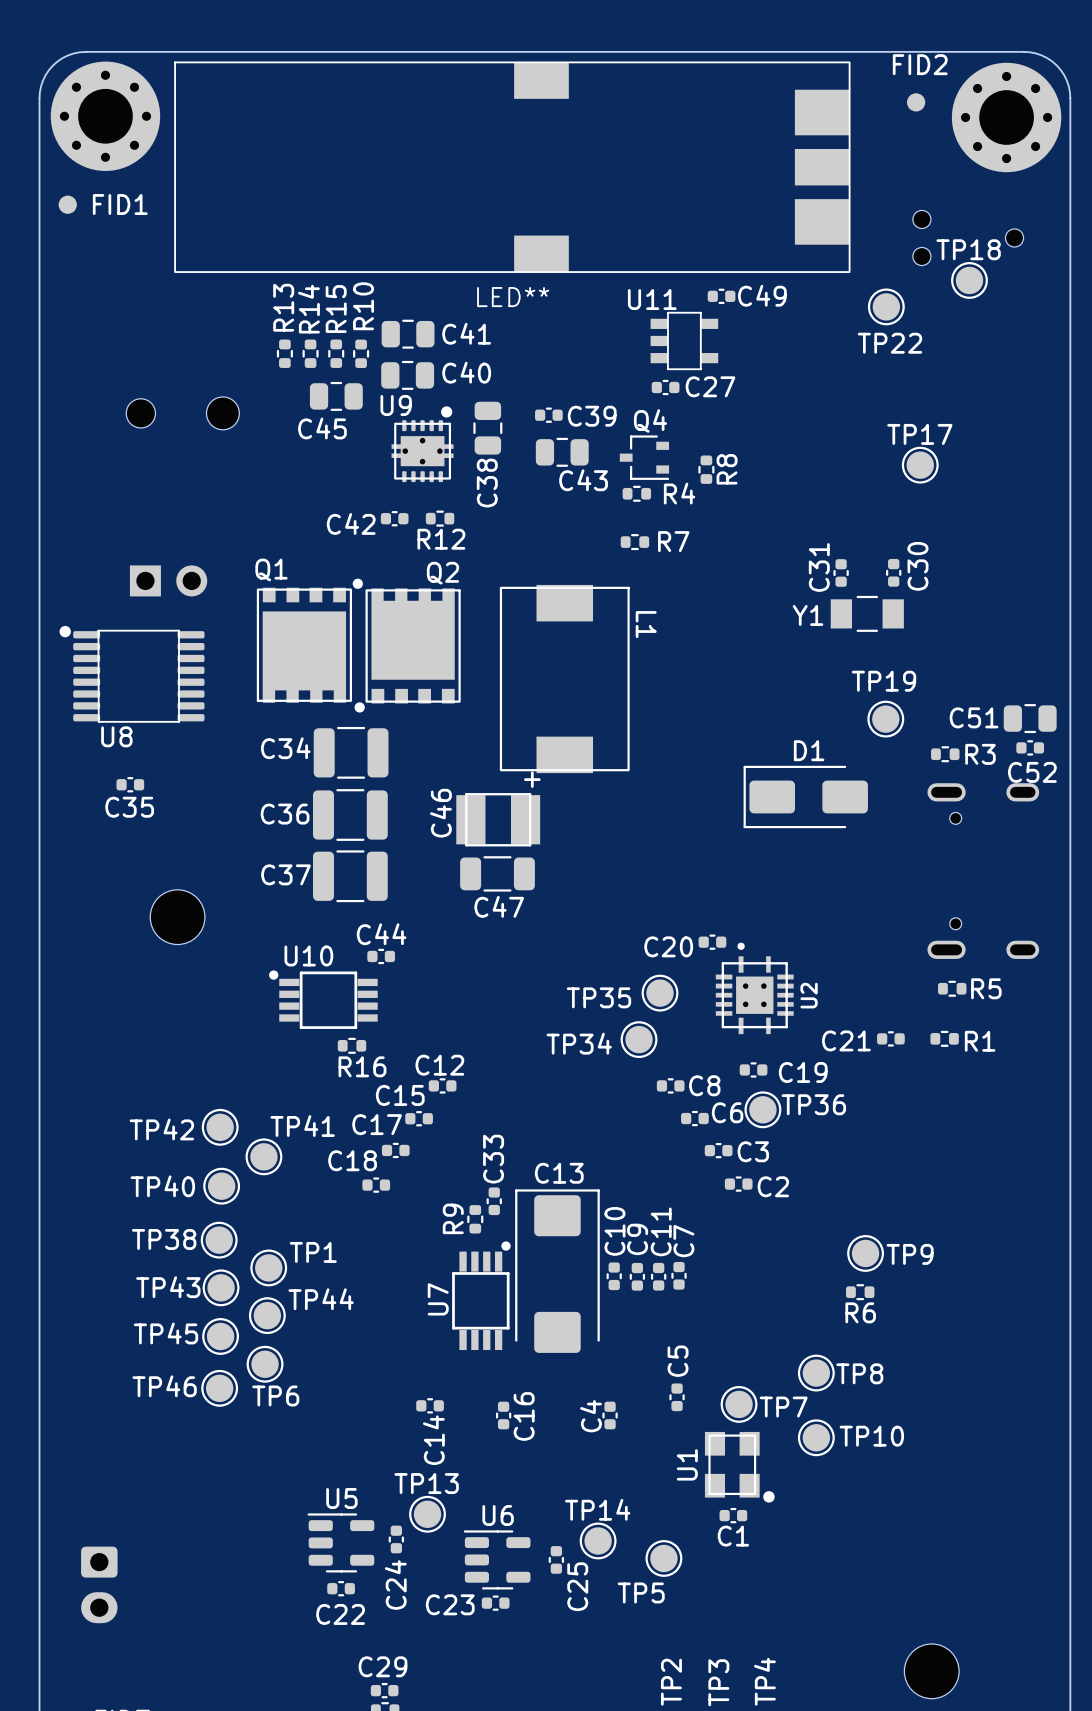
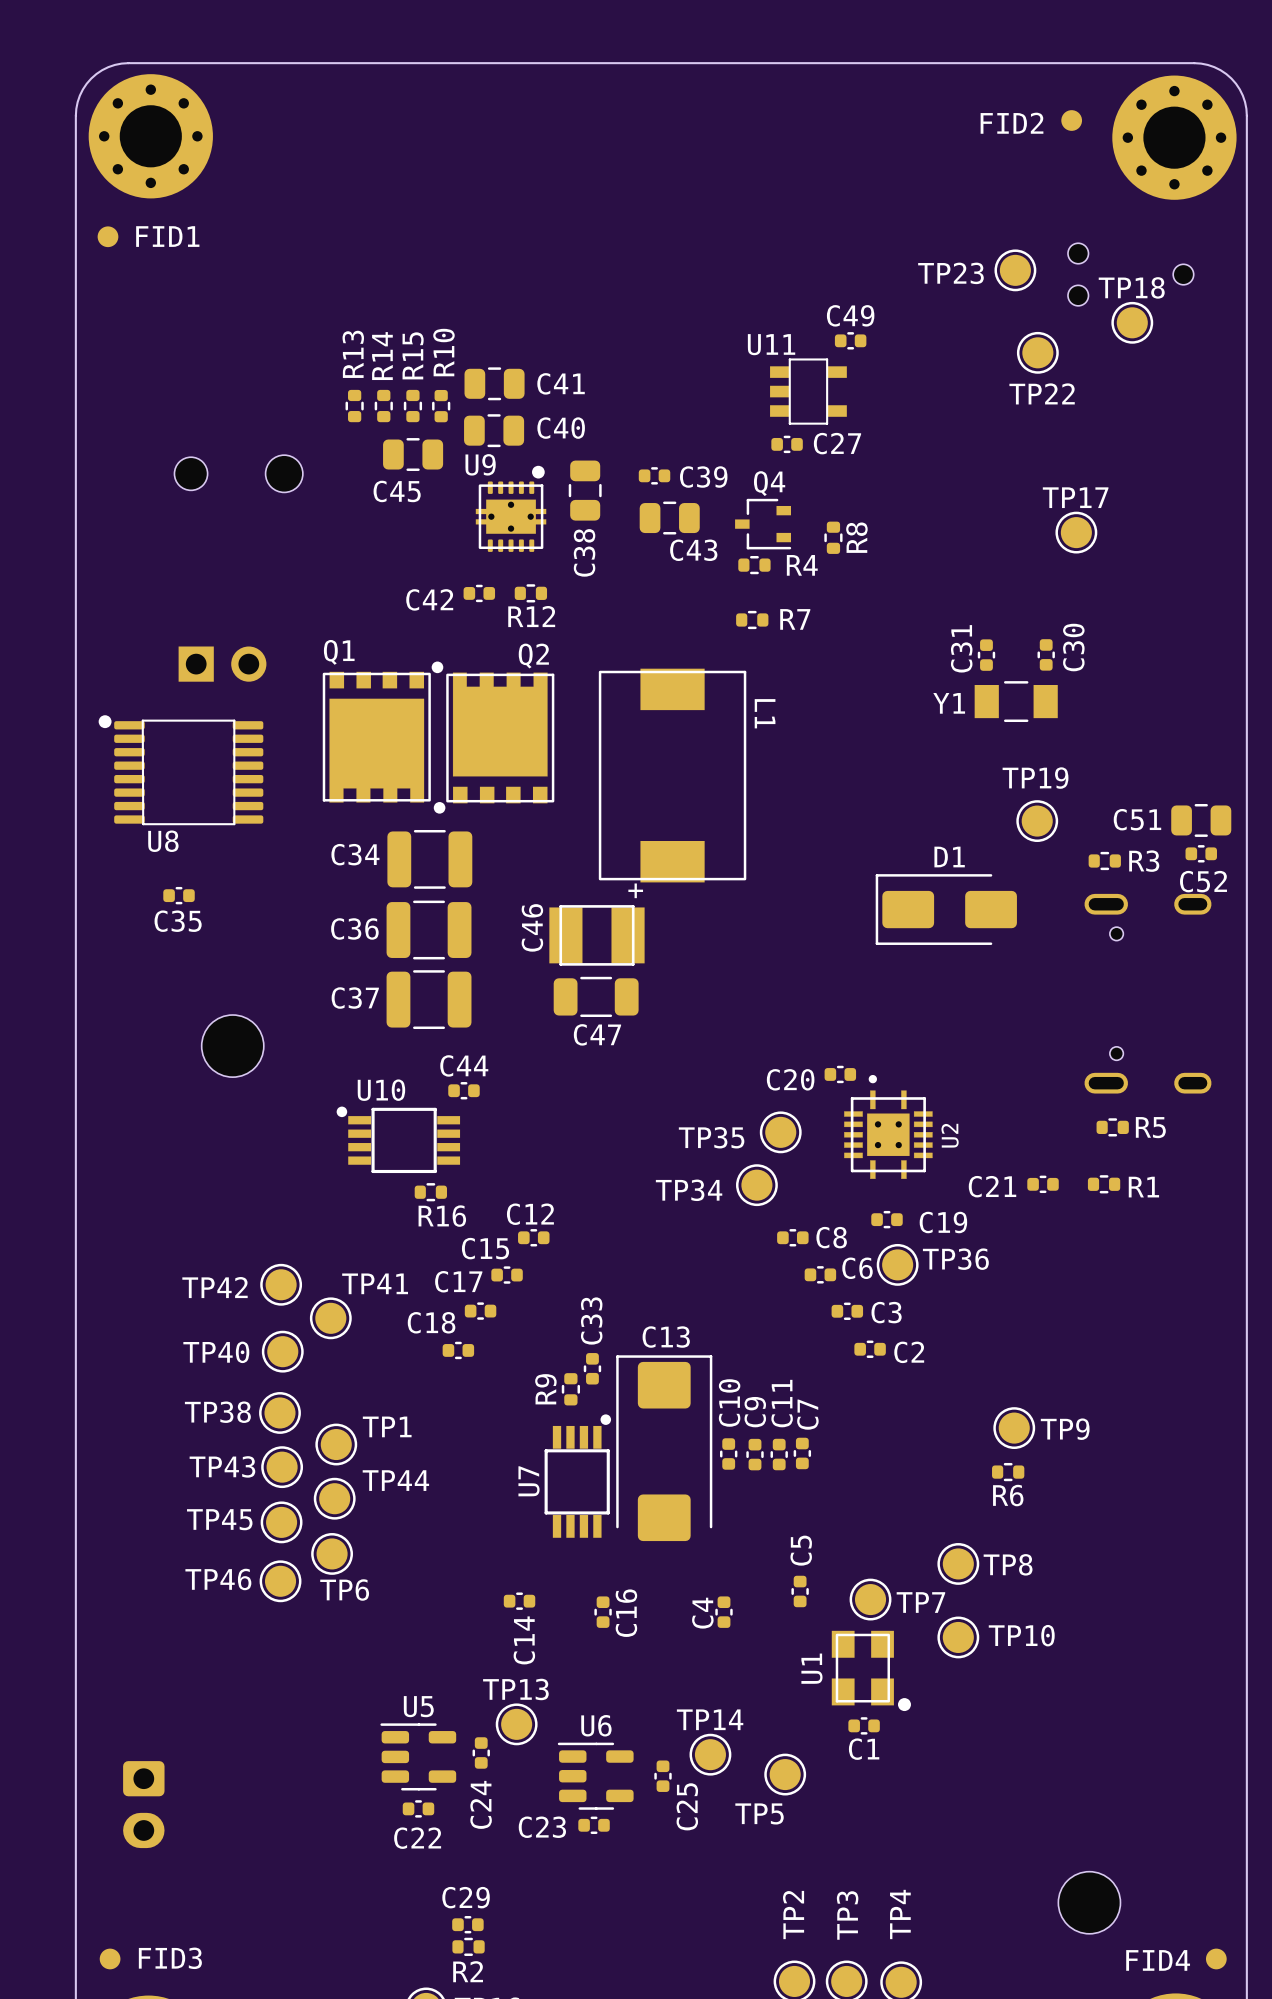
FID2 name position: FID2 (920, 64) -> FID2 (1012, 123)
LED**: (512, 167) -> none
TP23: none -> (1015, 270)
C49 name position: C49 (762, 295) -> C49 (850, 315)

